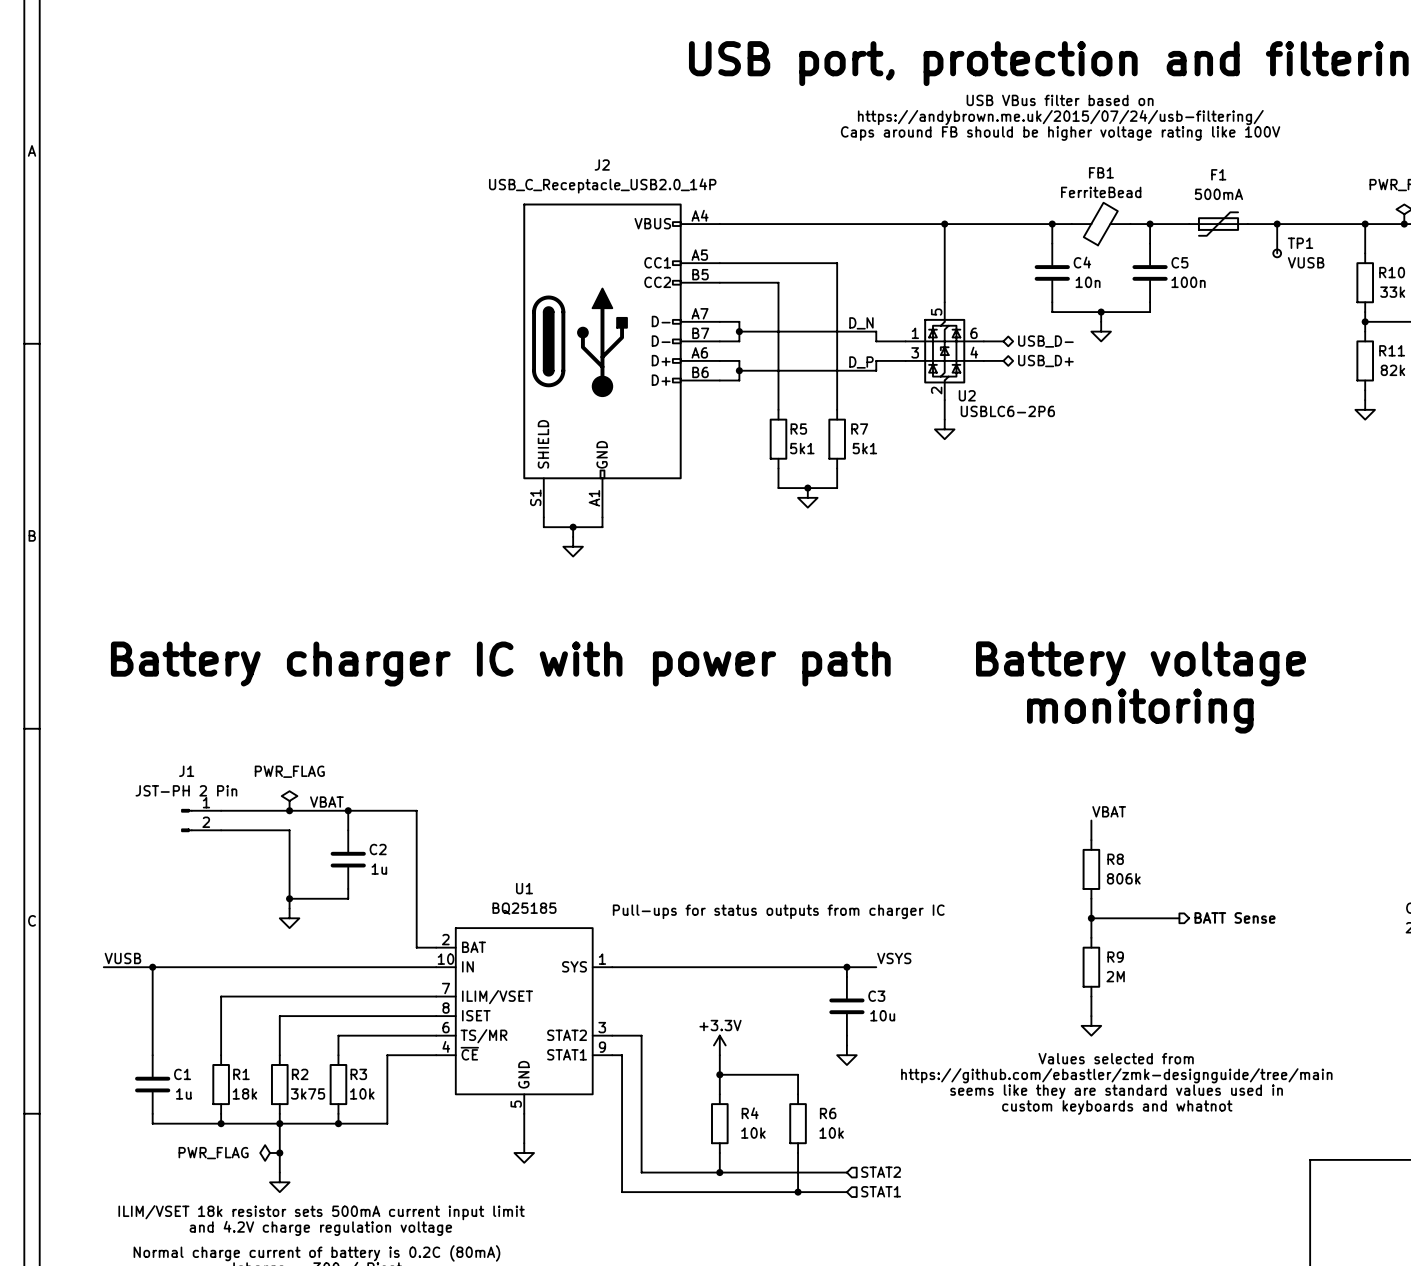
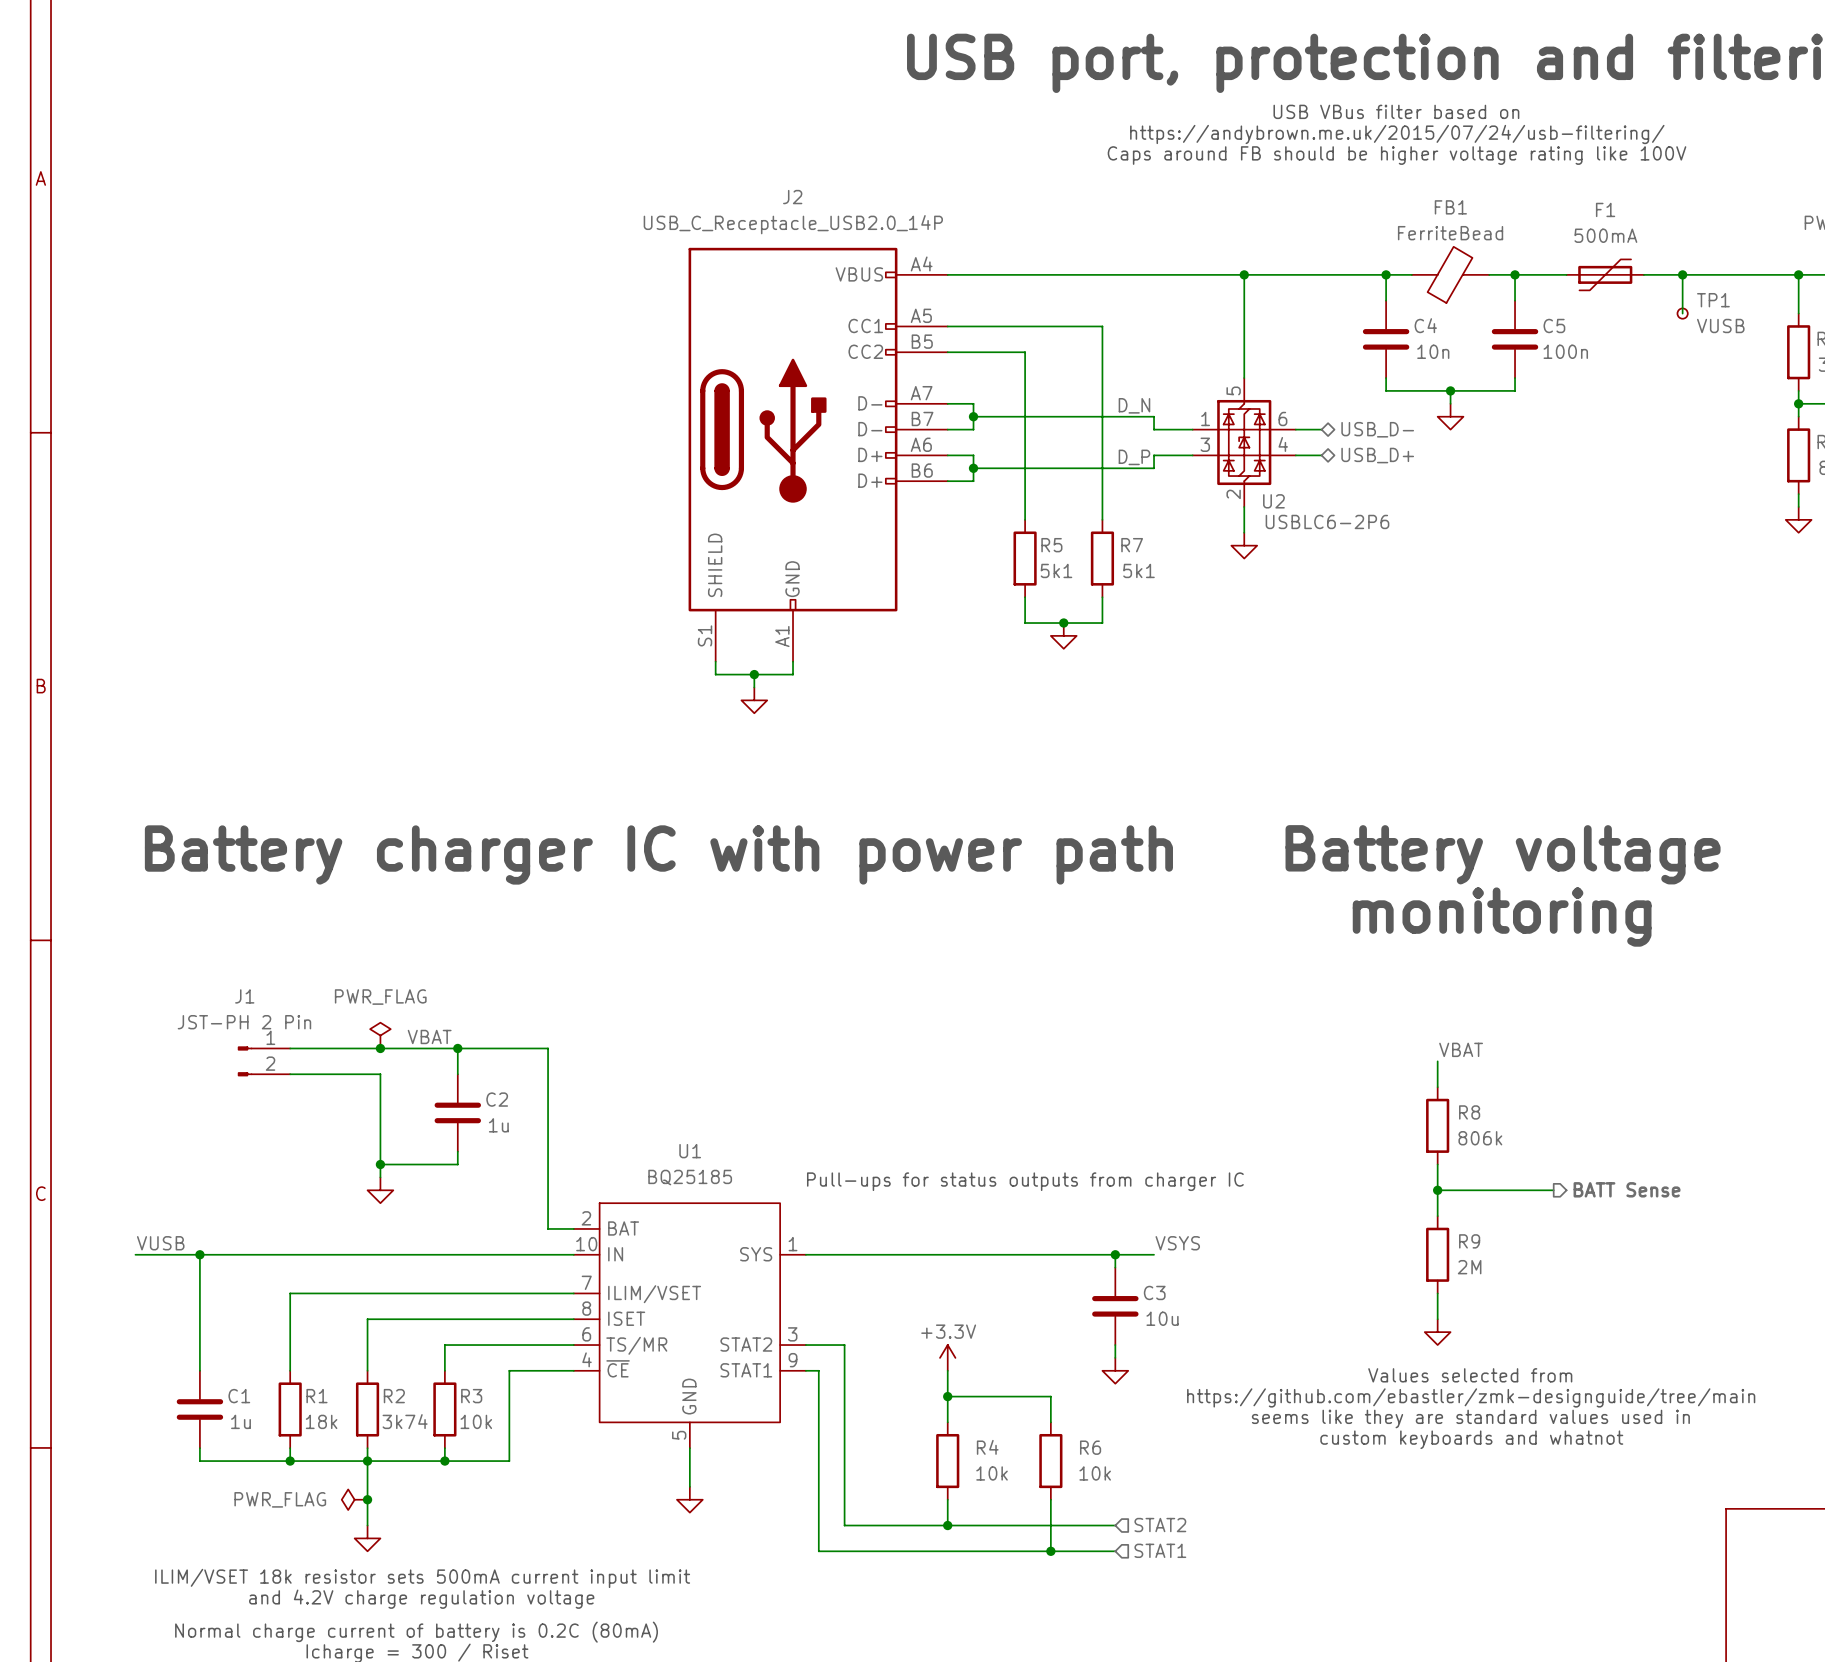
R2 value: 3k75 (308, 1093) -> 3k74 (405, 1421)

